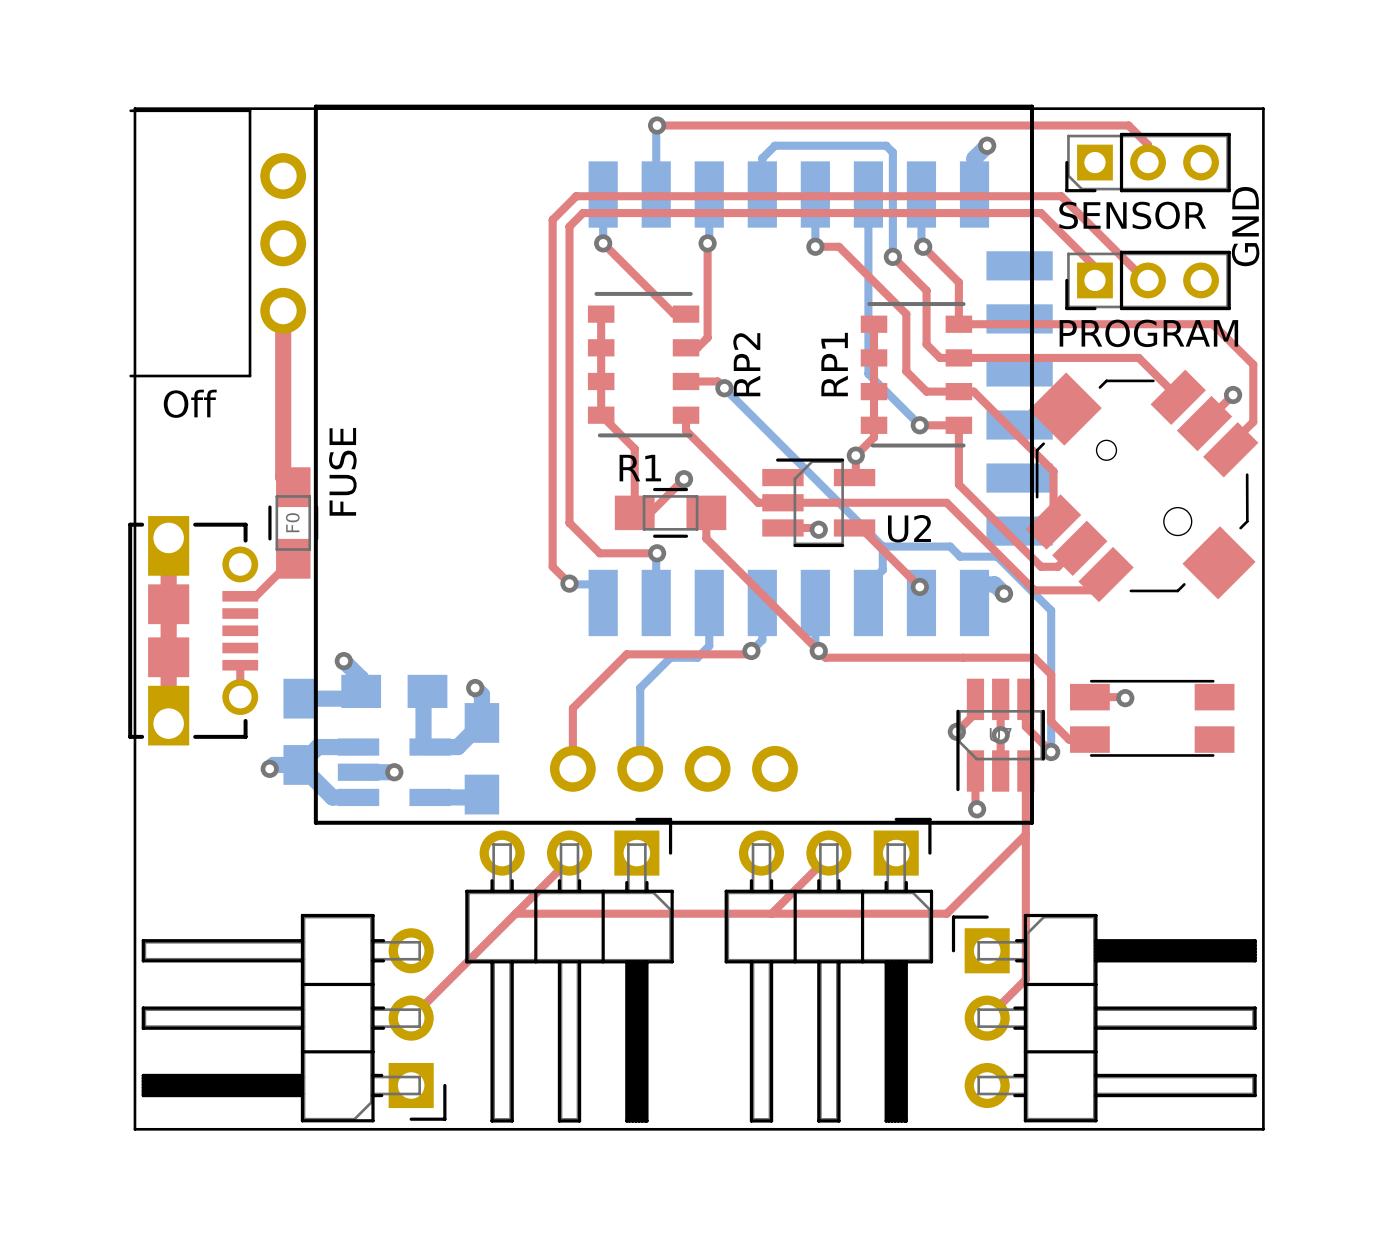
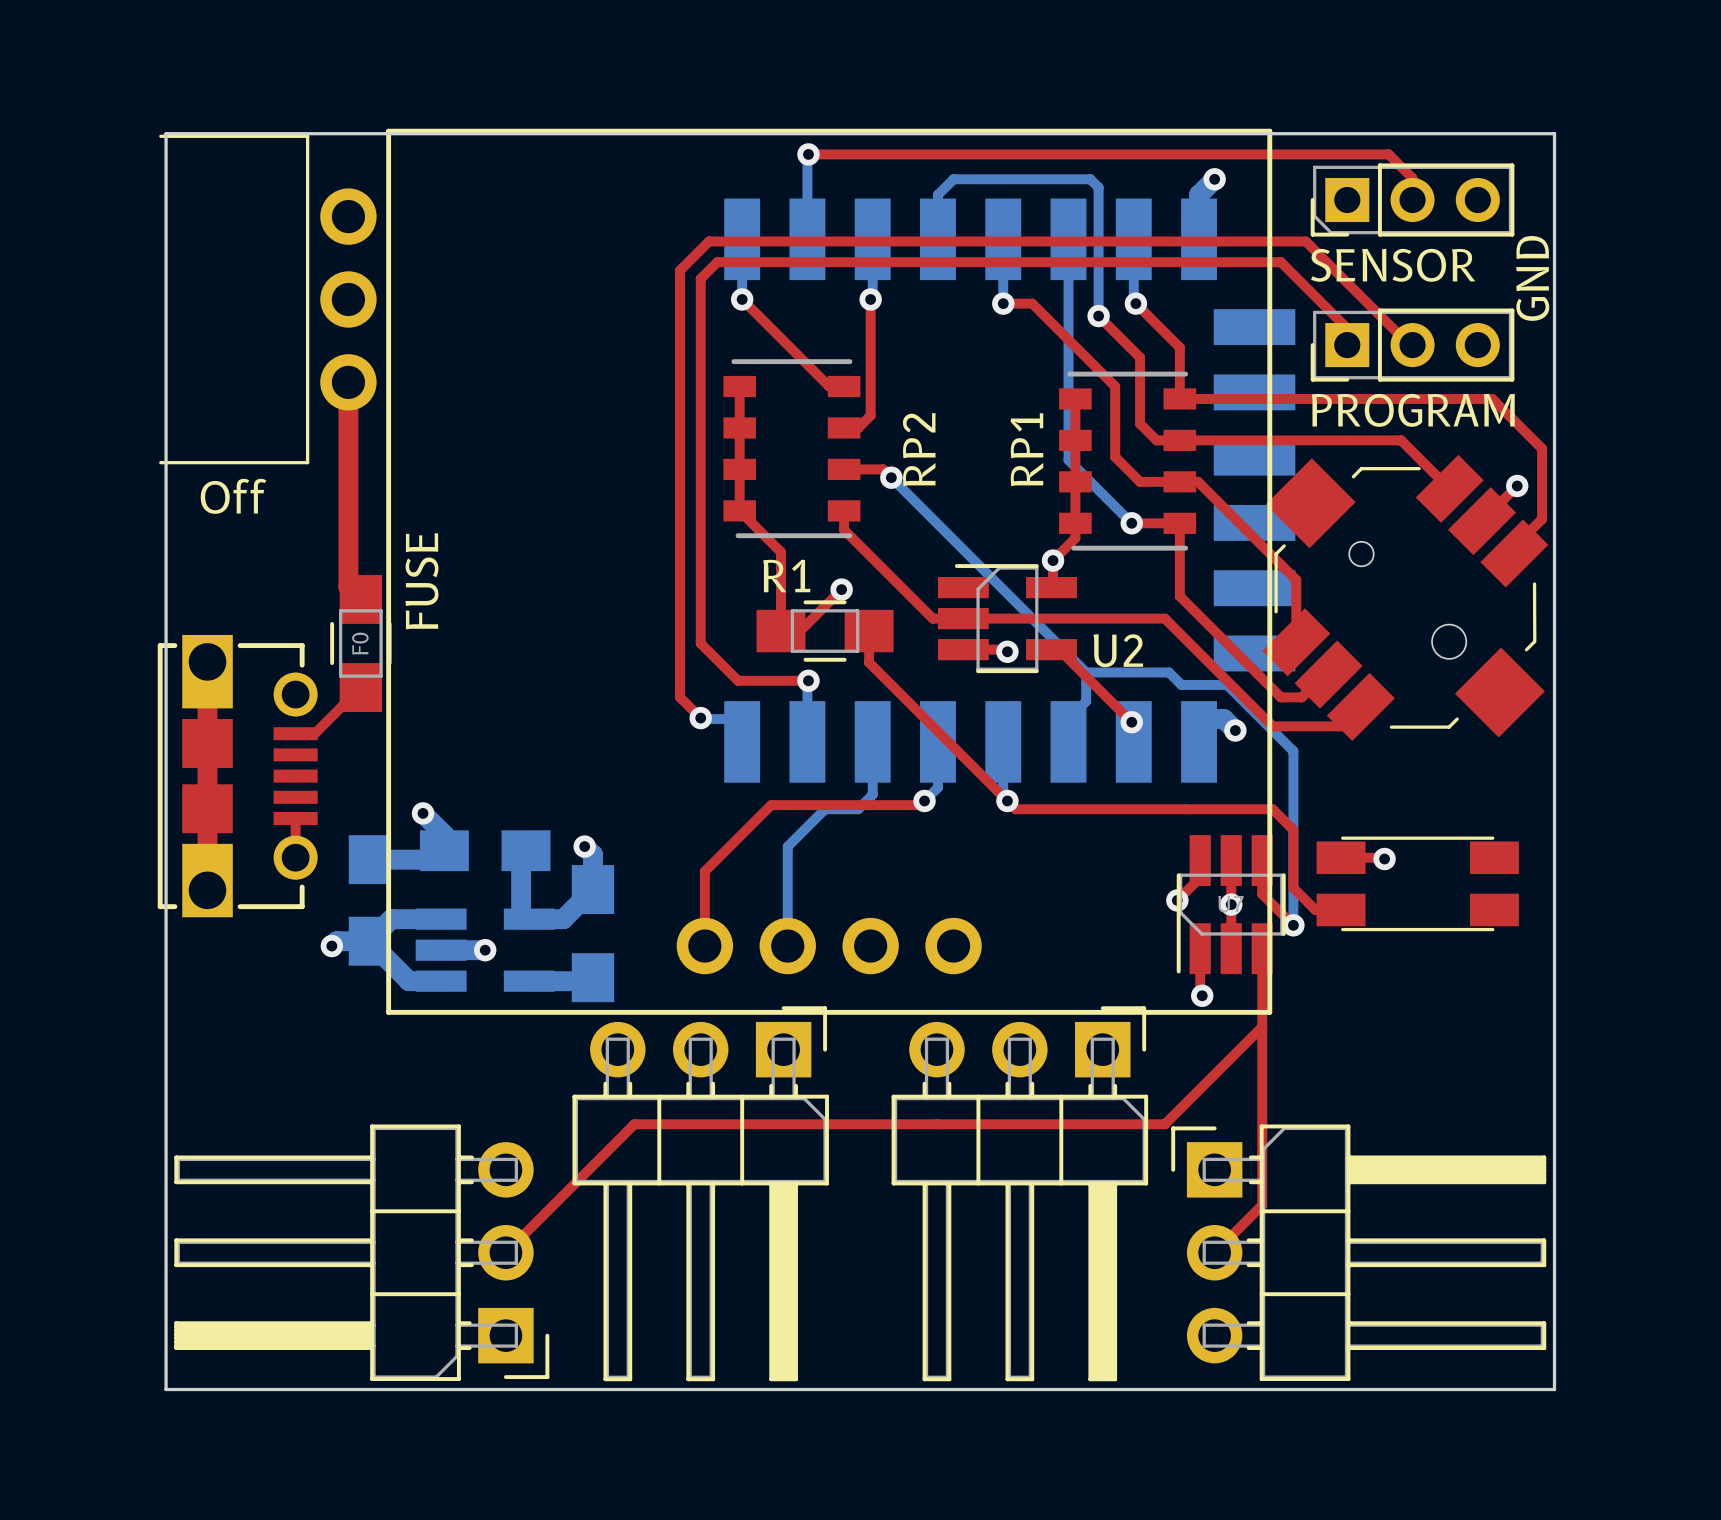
top track: (569, 853) (569, 859) (515, 913) -> none
top track: (828, 853) (828, 856) (771, 913) -> none

